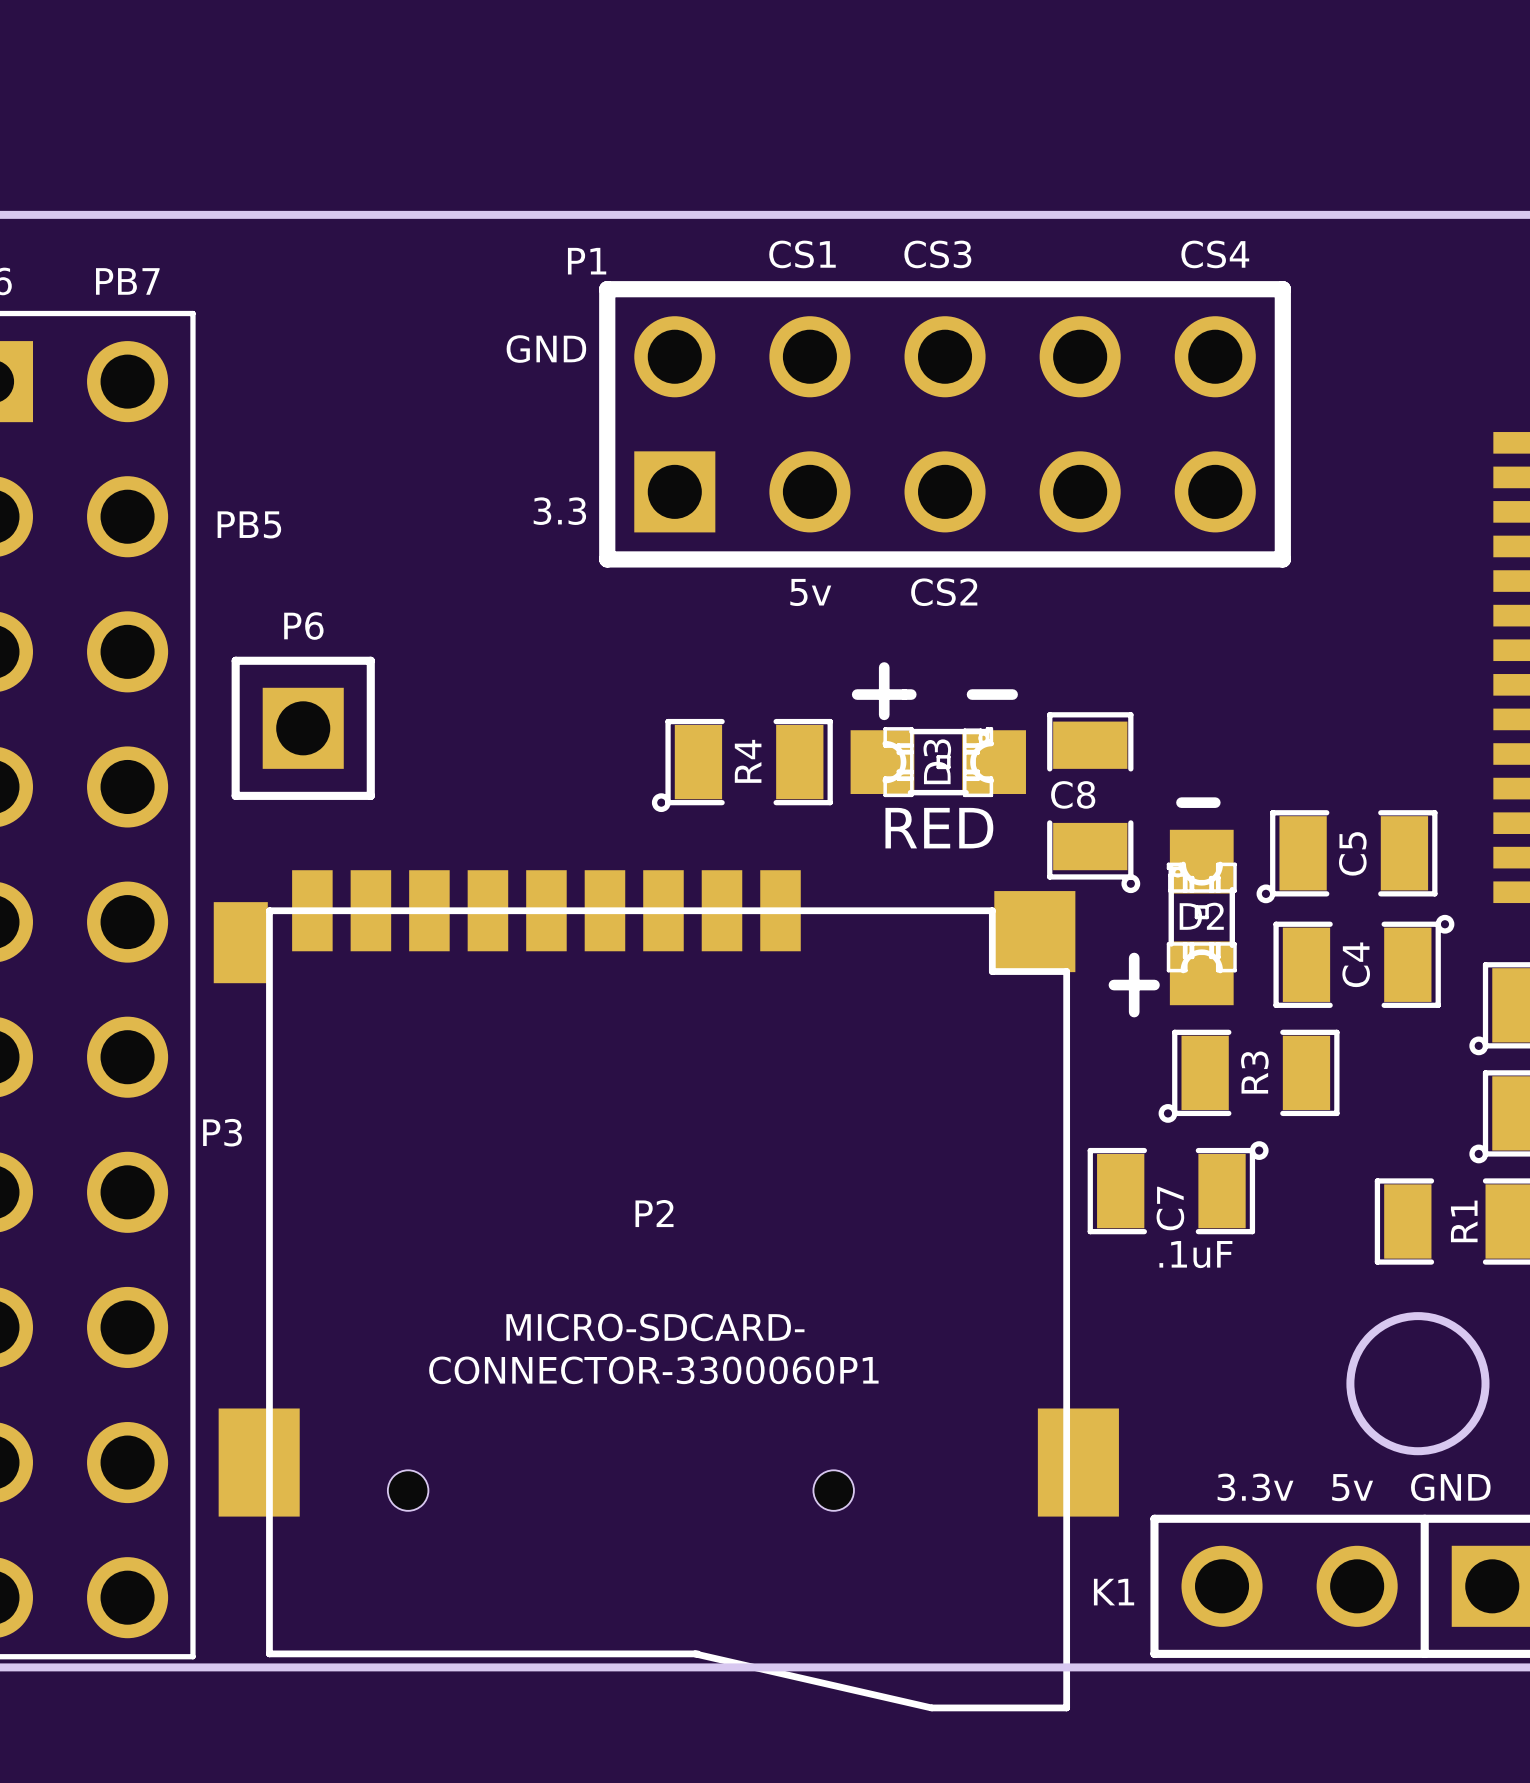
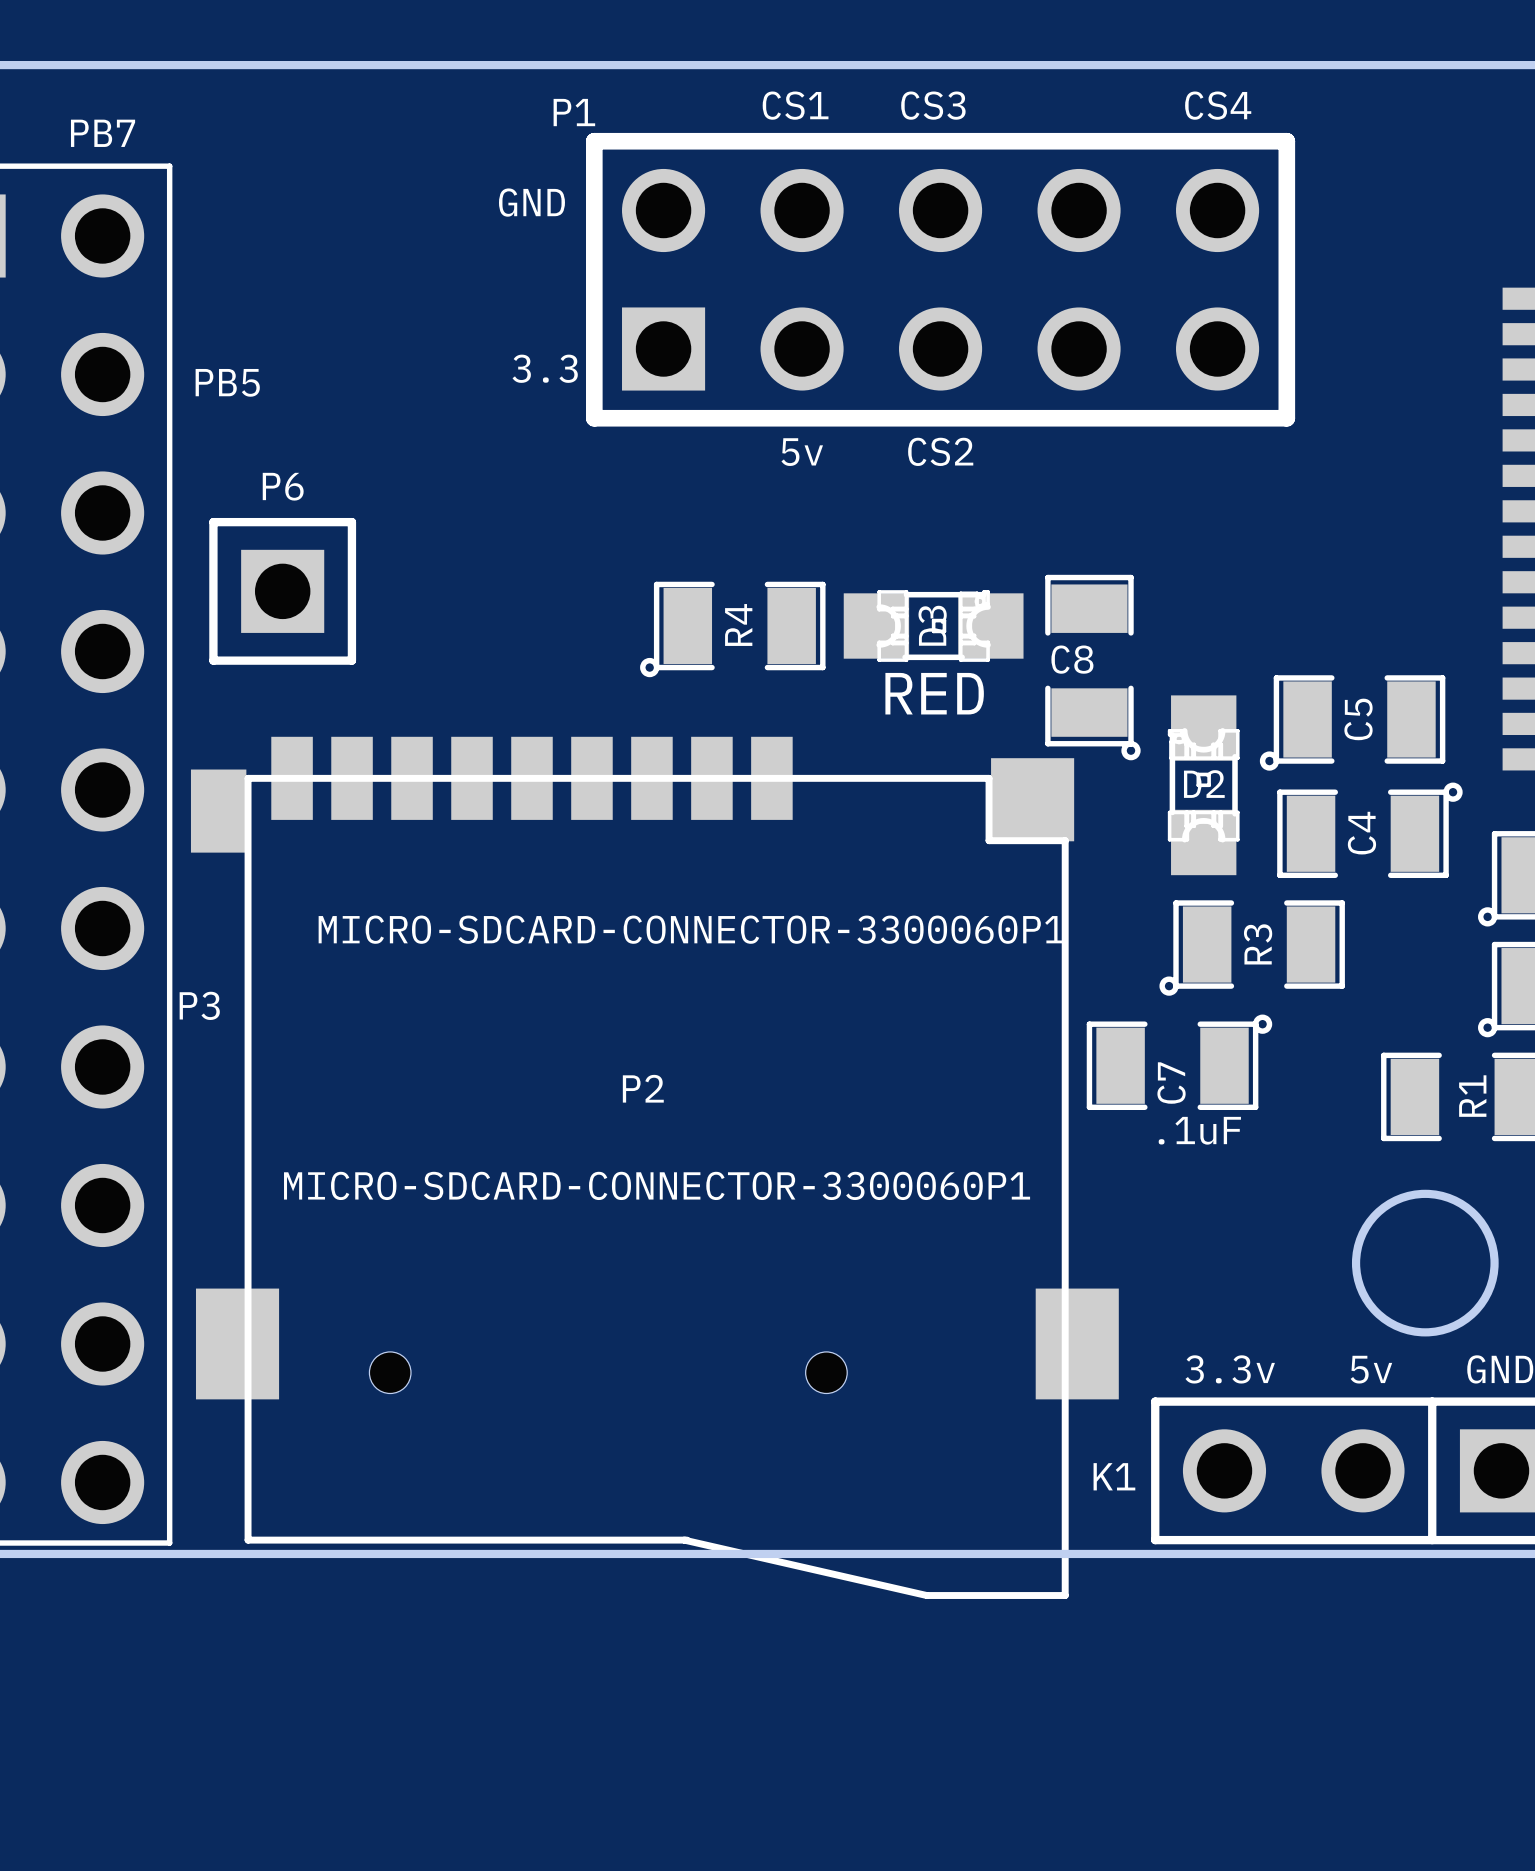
line: (884, 667) (884, 714) -> none
line: (857, 694) (911, 694) -> none
line: (972, 694) (1012, 694) -> none
line: (1181, 802) (1215, 802) -> none
line: (1134, 958) (1134, 1012) -> none
line: (1113, 985) (1154, 985) -> none
text: none -> MICRO-SDCARD-CONNECTOR-3300060P1 (691, 929)
P2 value: none -> MICRO-SDCARD-CONNECTOR-3300060P1 (657, 1185)
text: MICRO-SDCARD- (655, 1327) -> none
text: CONNECTOR-3300060P1 (653, 1370) -> none

